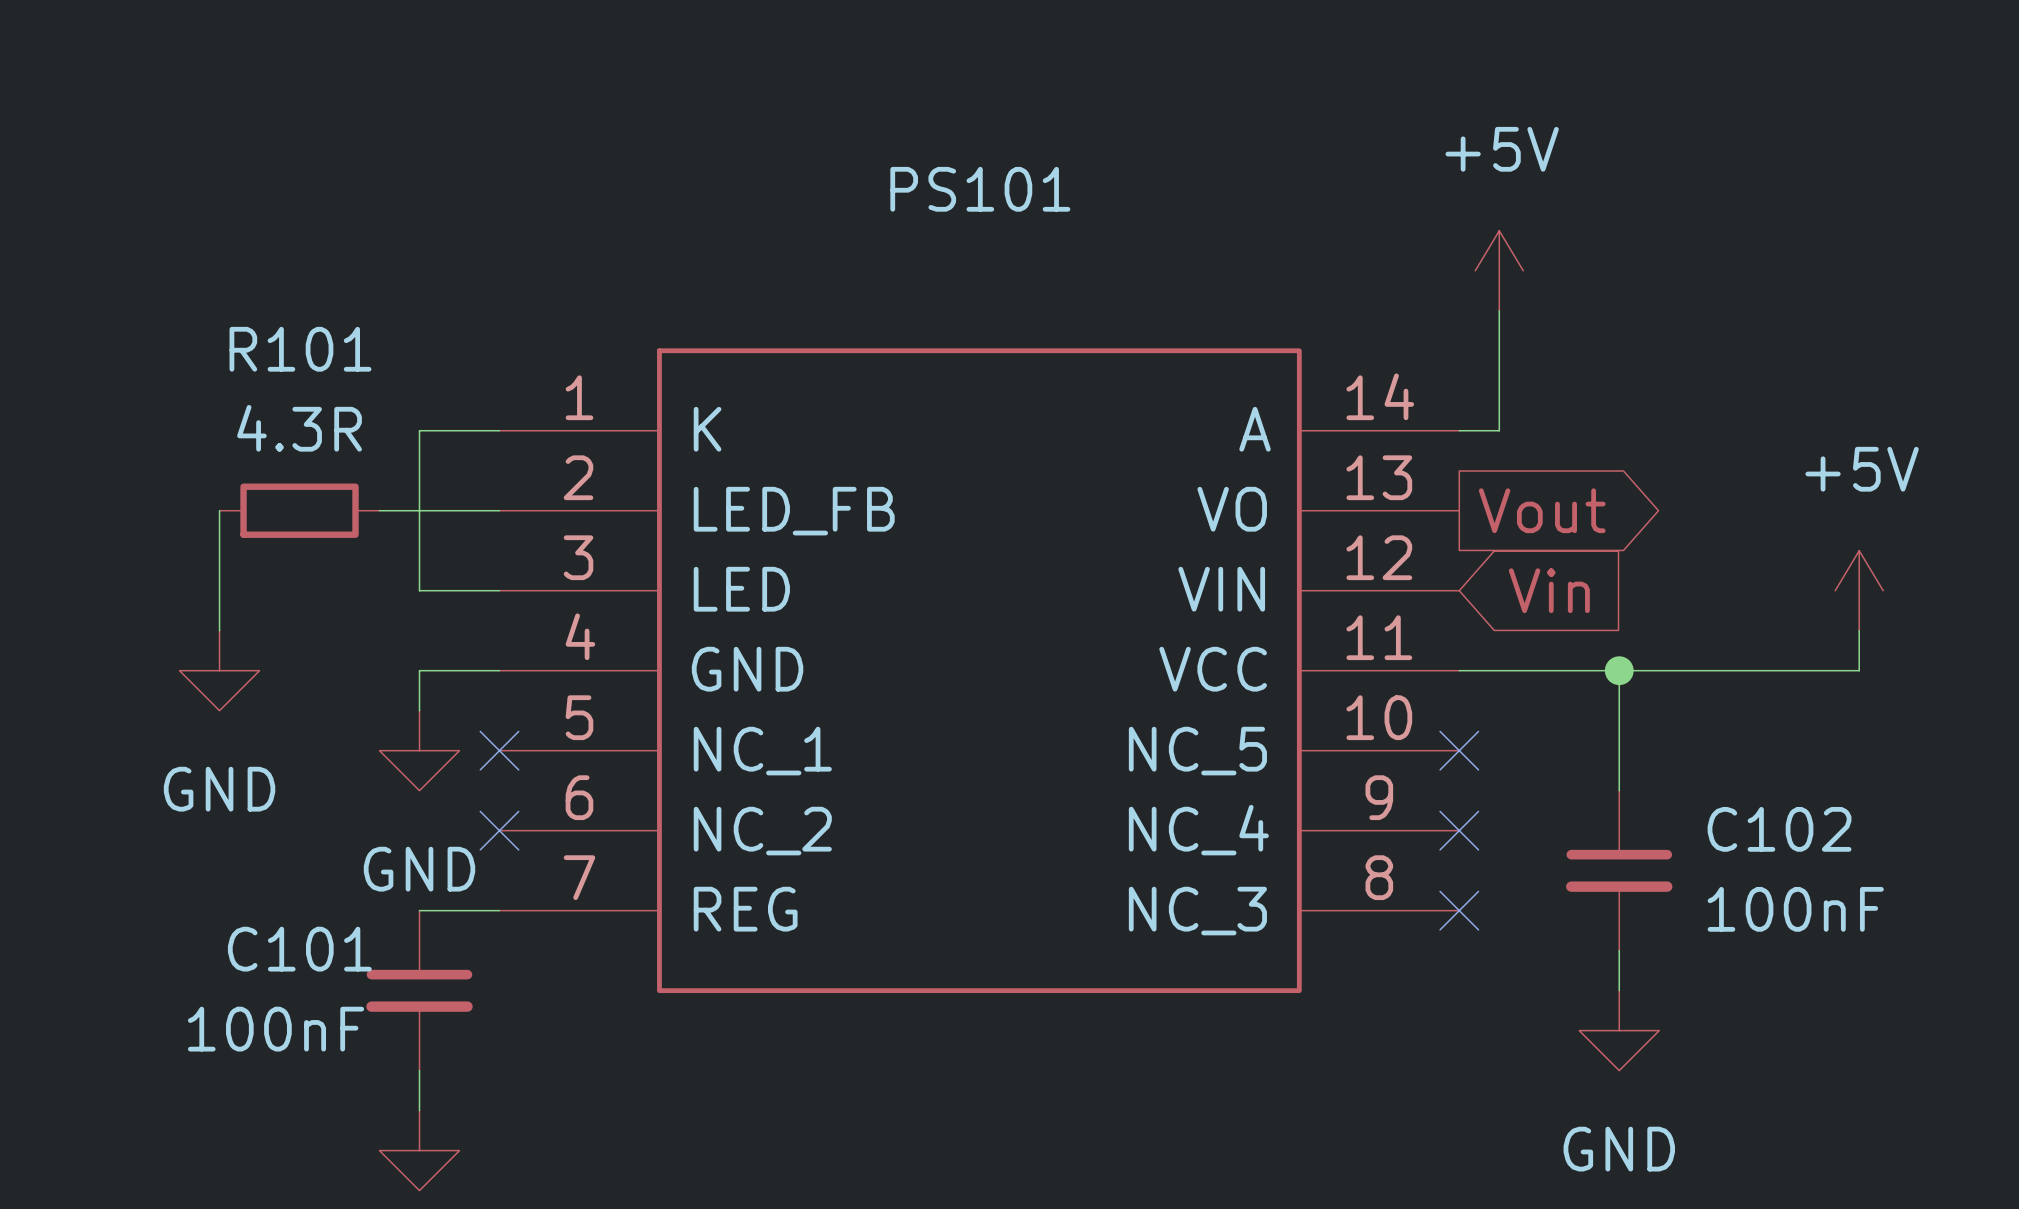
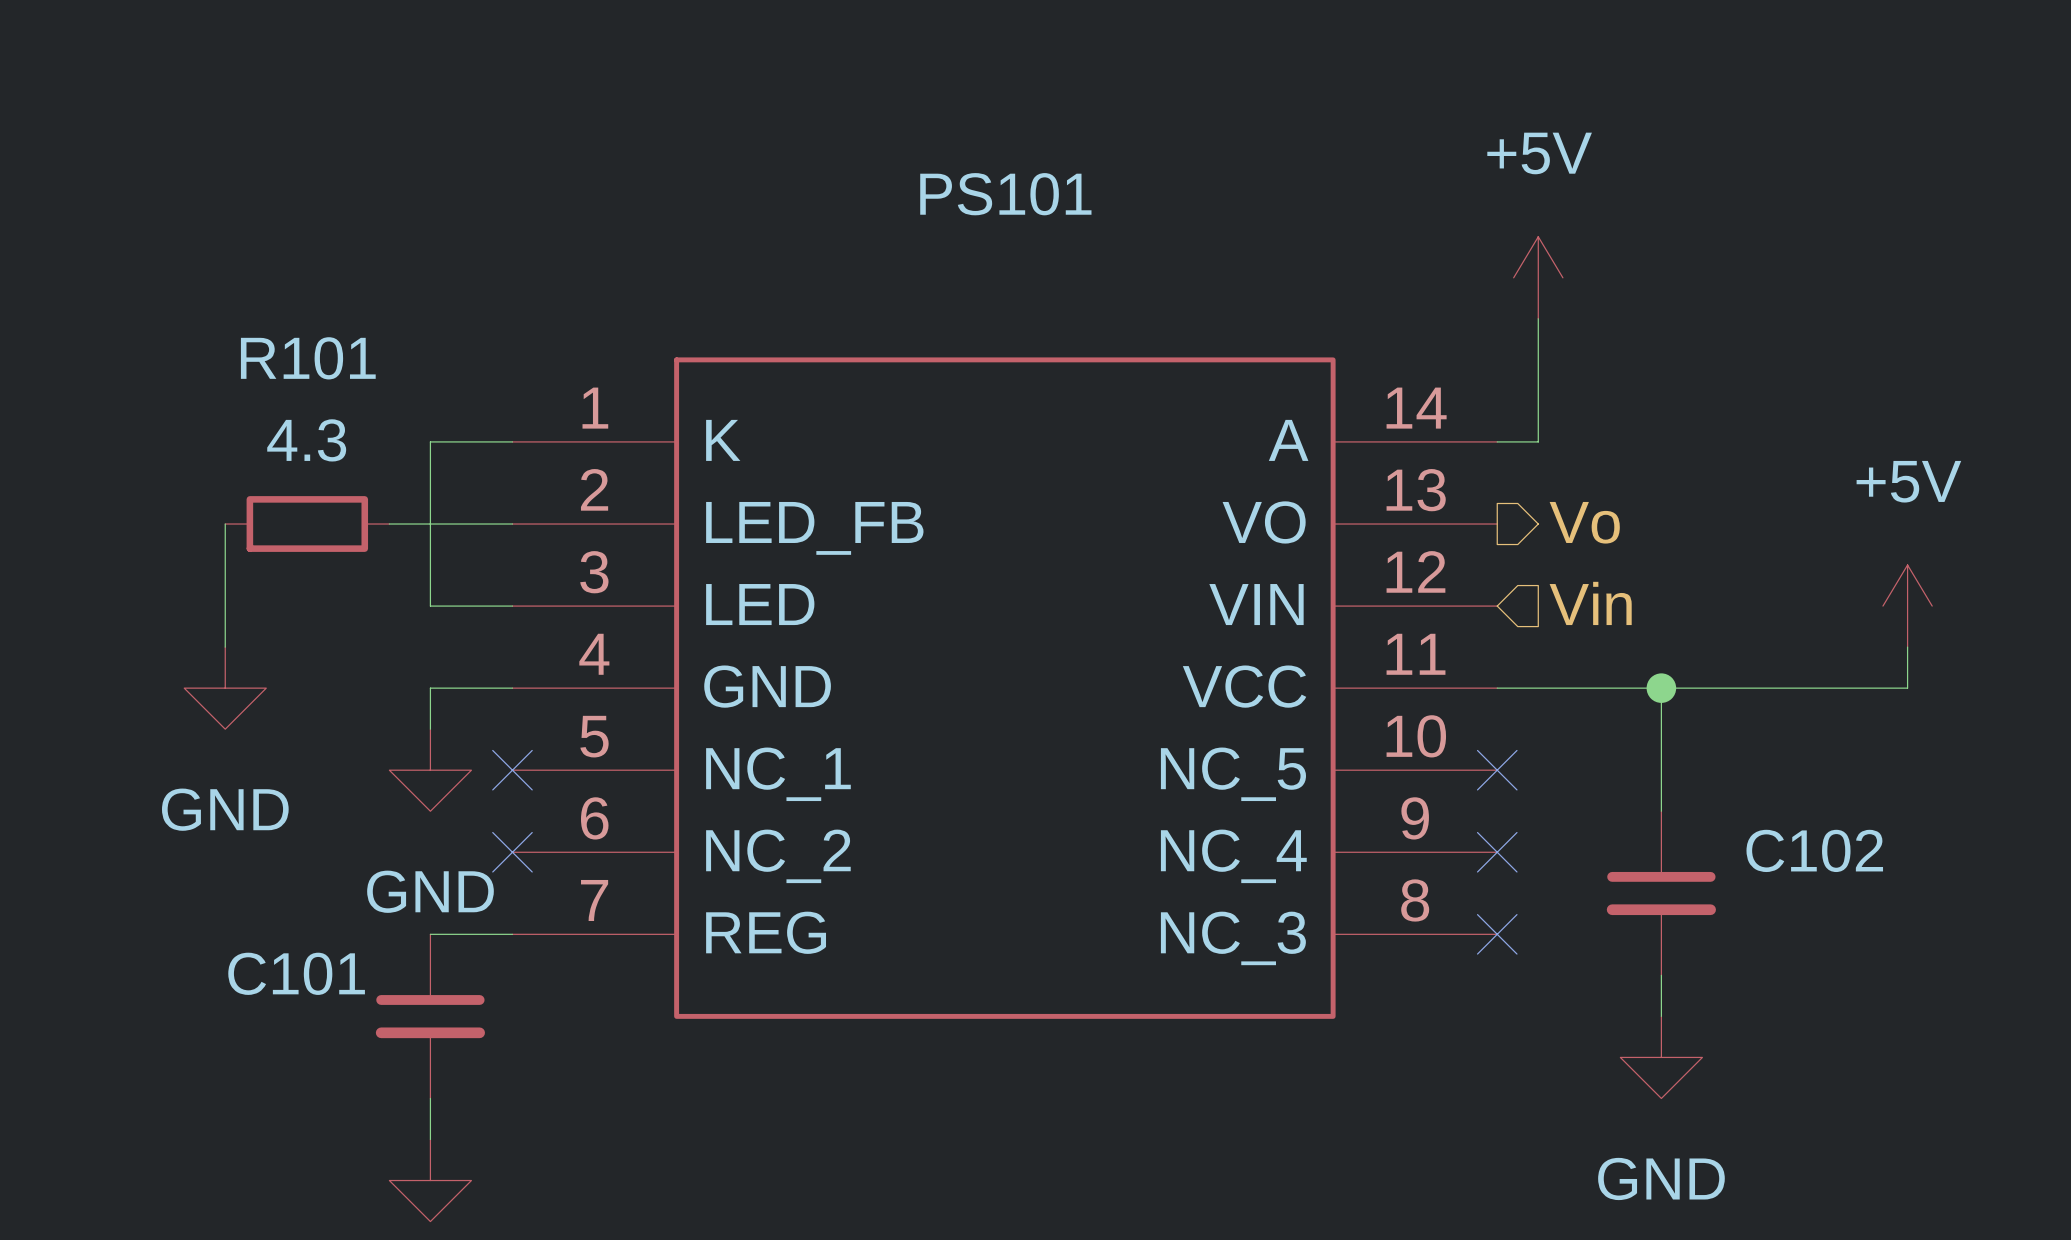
R101 value: 4.3R (299, 428) -> 4.3 (306, 440)
hierarchical label: none -> Vo (1584, 522)
global label: Vout (1542, 510) -> none
hierarchical label: none -> Vin (1590, 603)
global label: Vin (1549, 590) -> none
C102 value: 100nF (1795, 909) -> none
C101 value: 100nF (276, 1029) -> none

